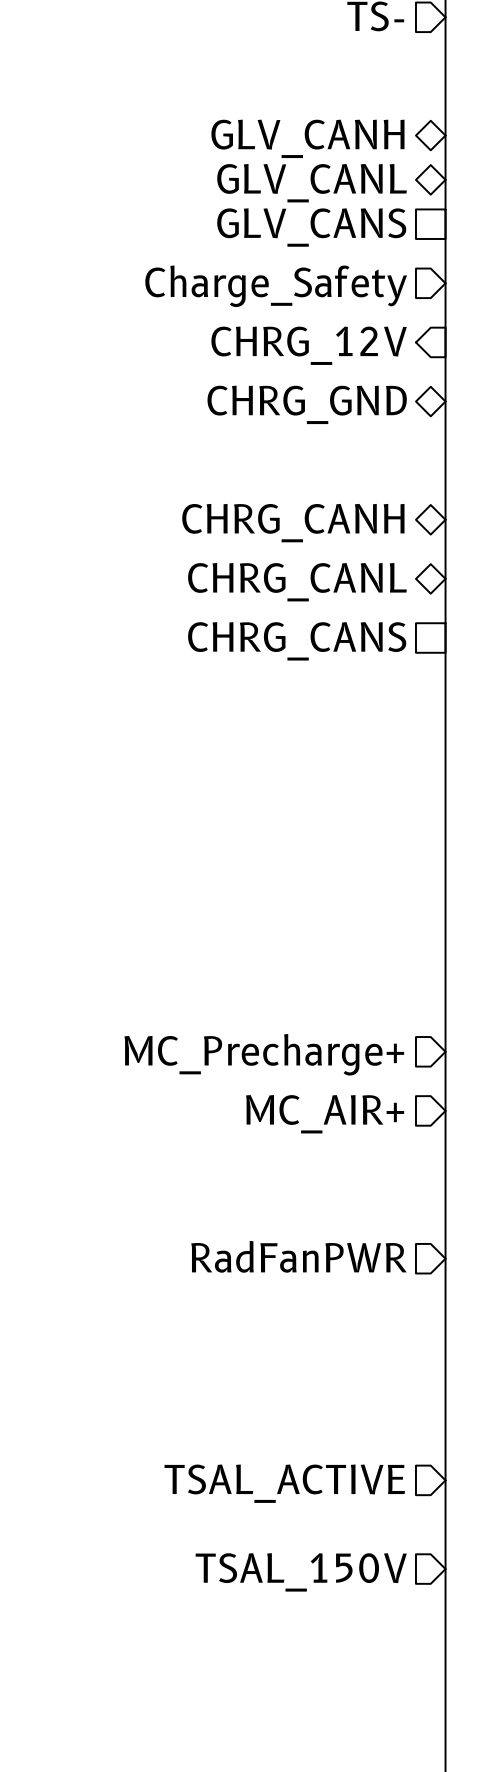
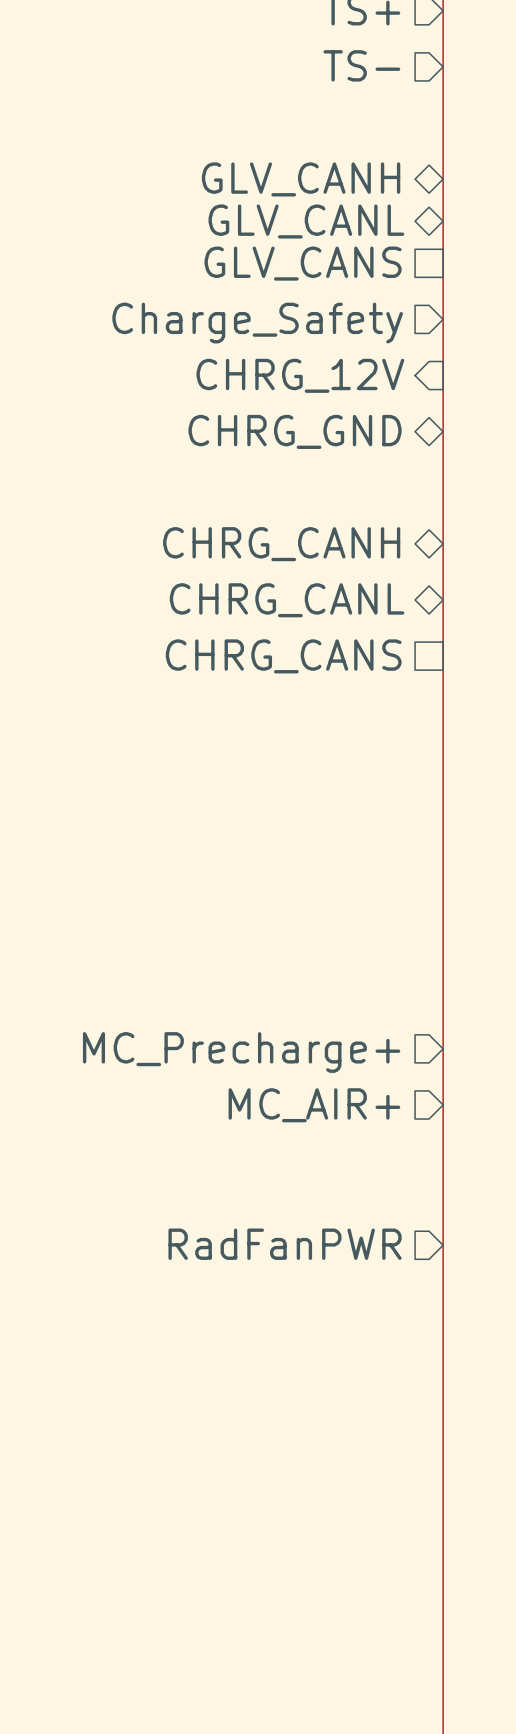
sheet pin: TSAL_ACTIVE (284, 1483) -> none
sheet pin: TSAL_150V (301, 1572) -> none

